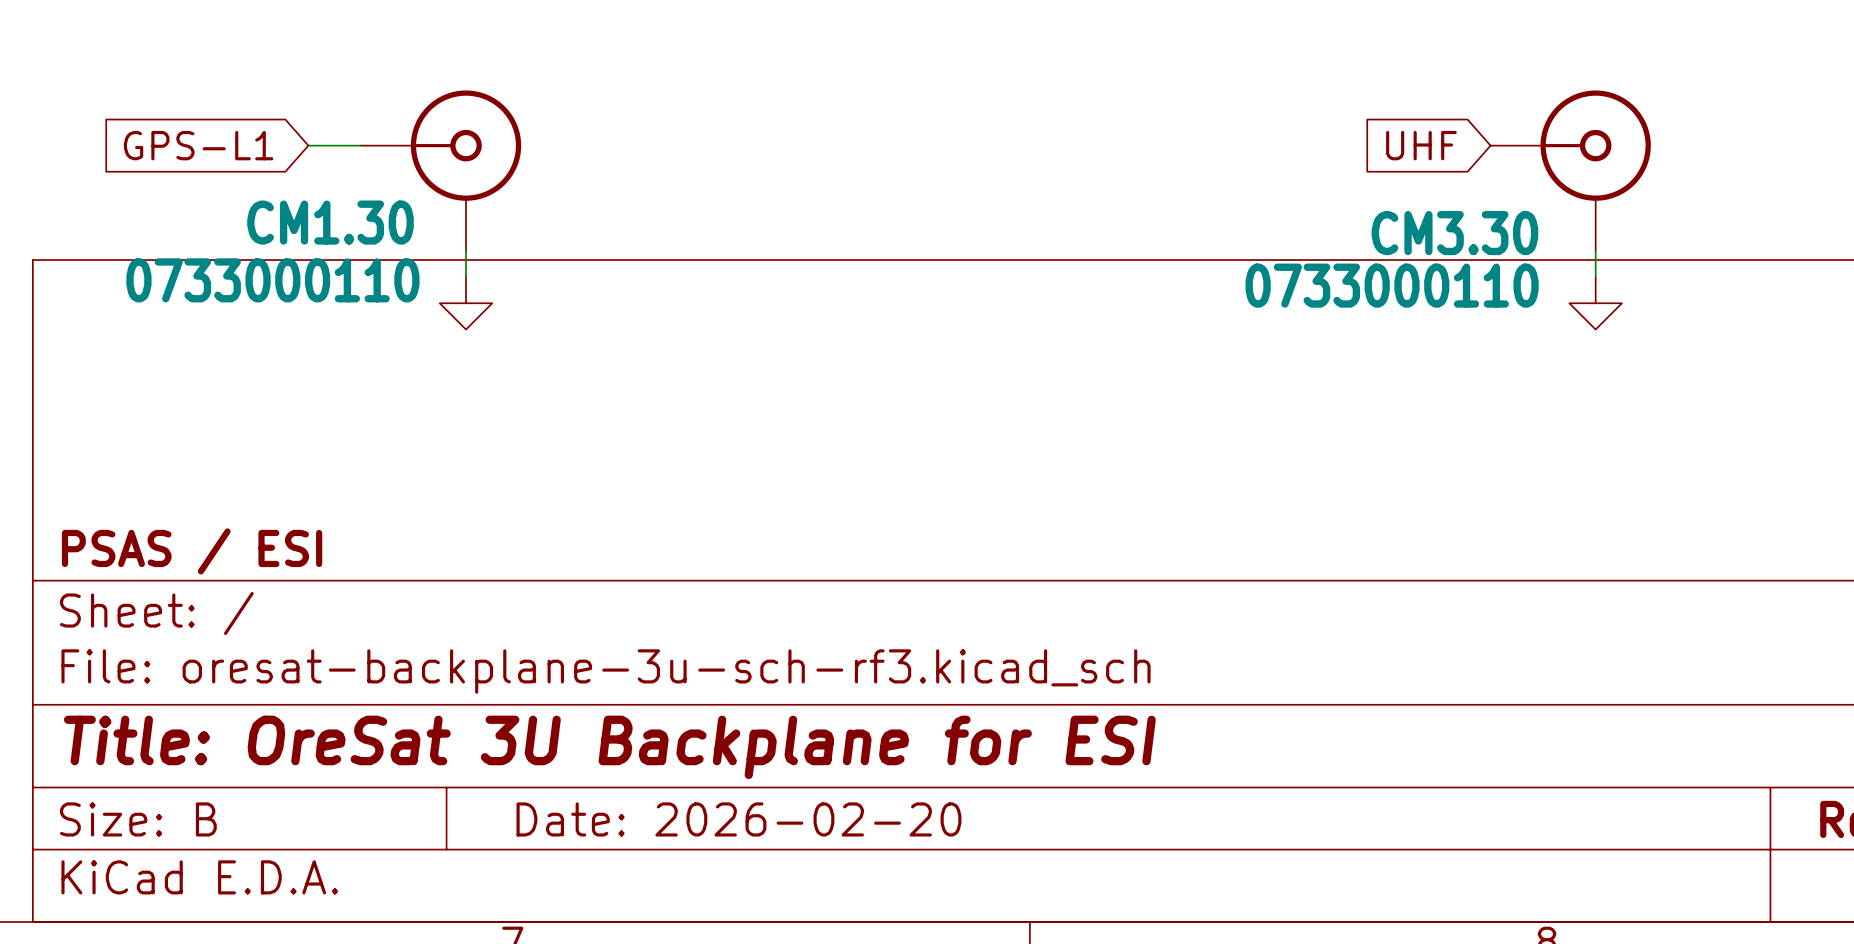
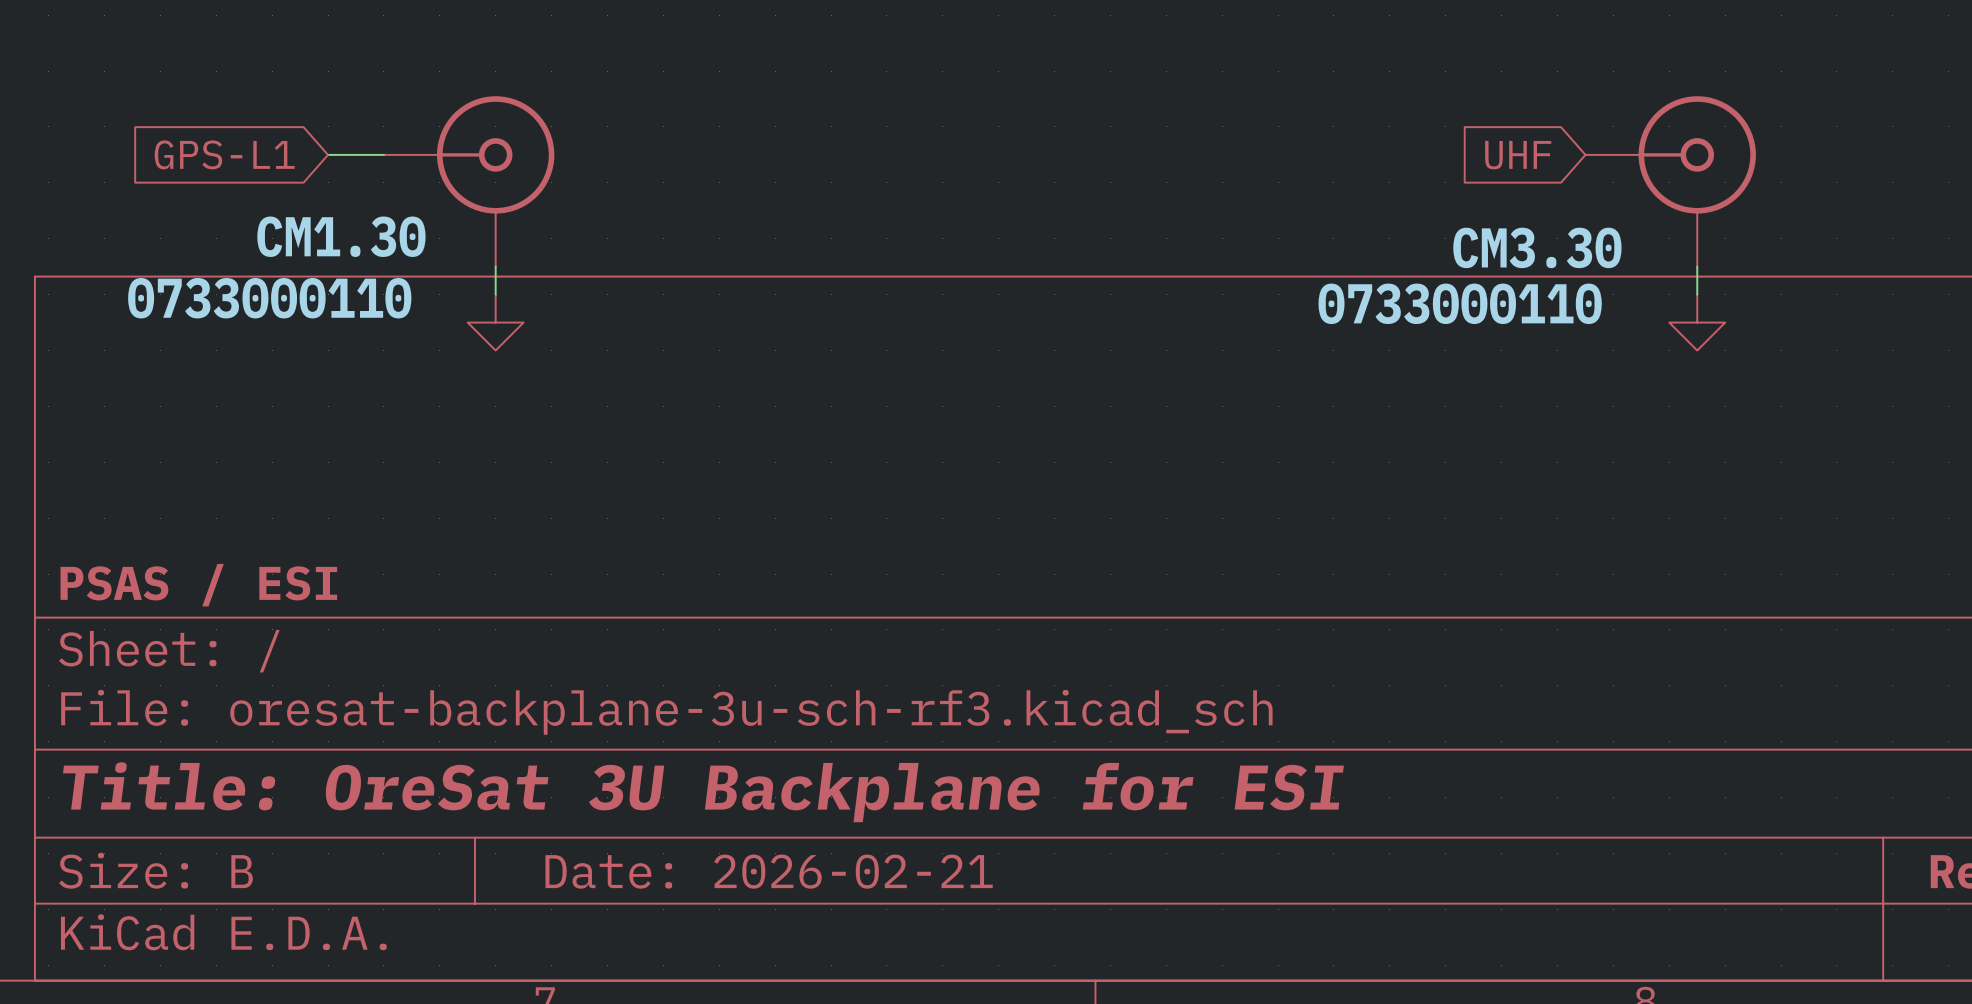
title block: Date: 2026-02-20 (738, 819) -> Date: 2026-02-21 (769, 871)

